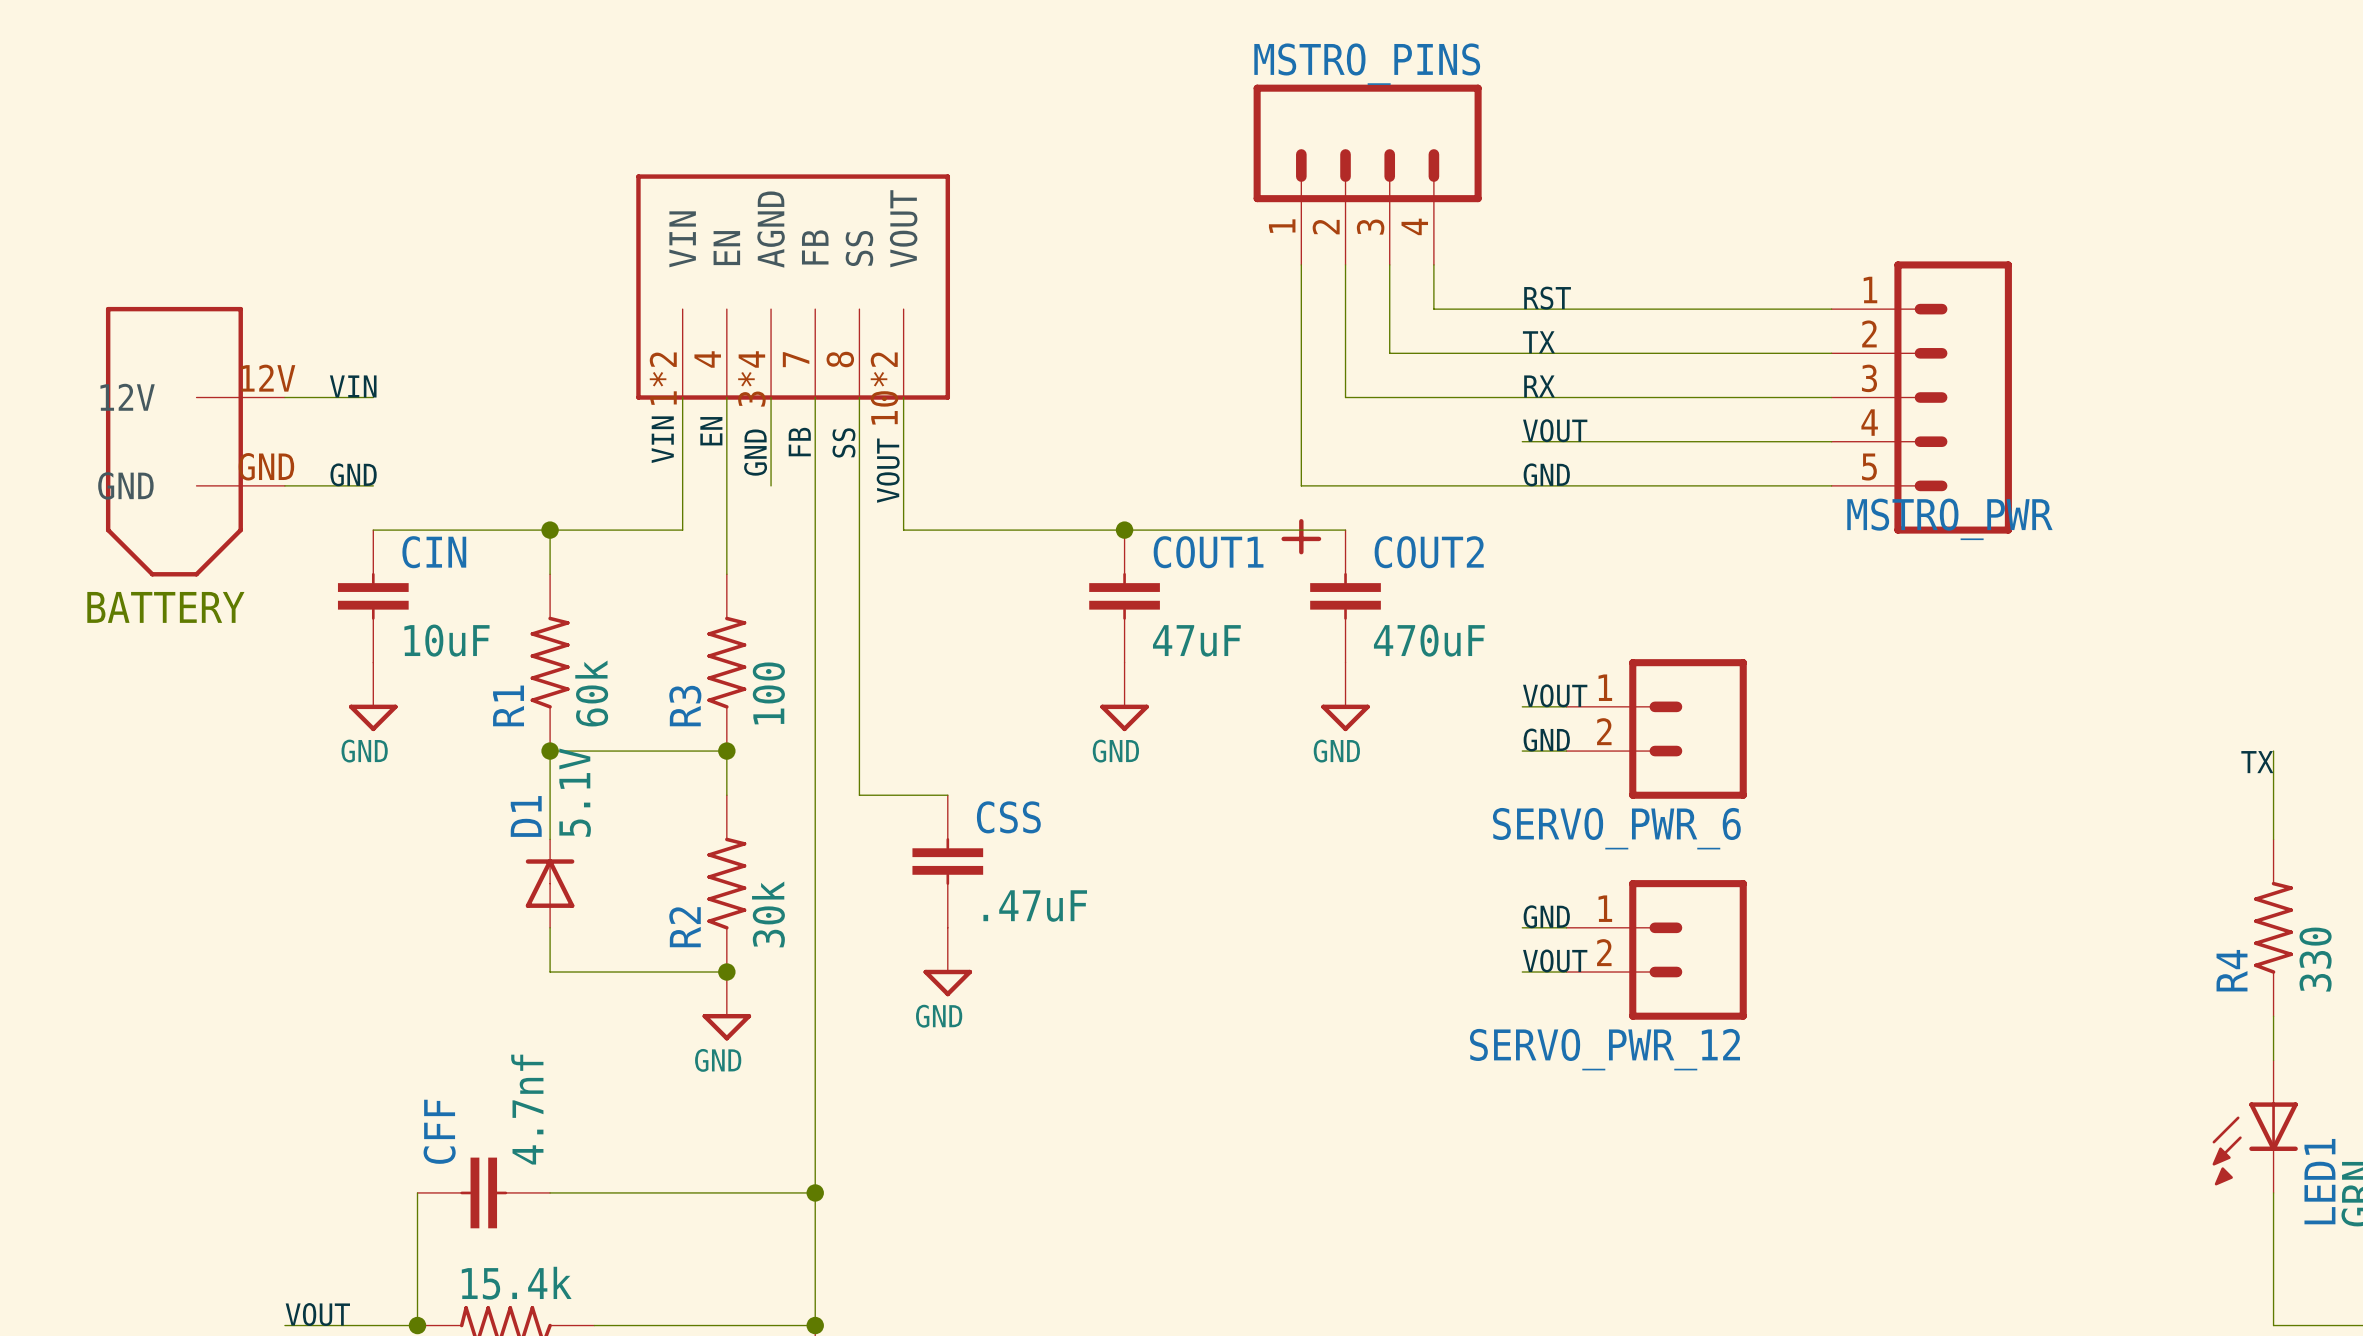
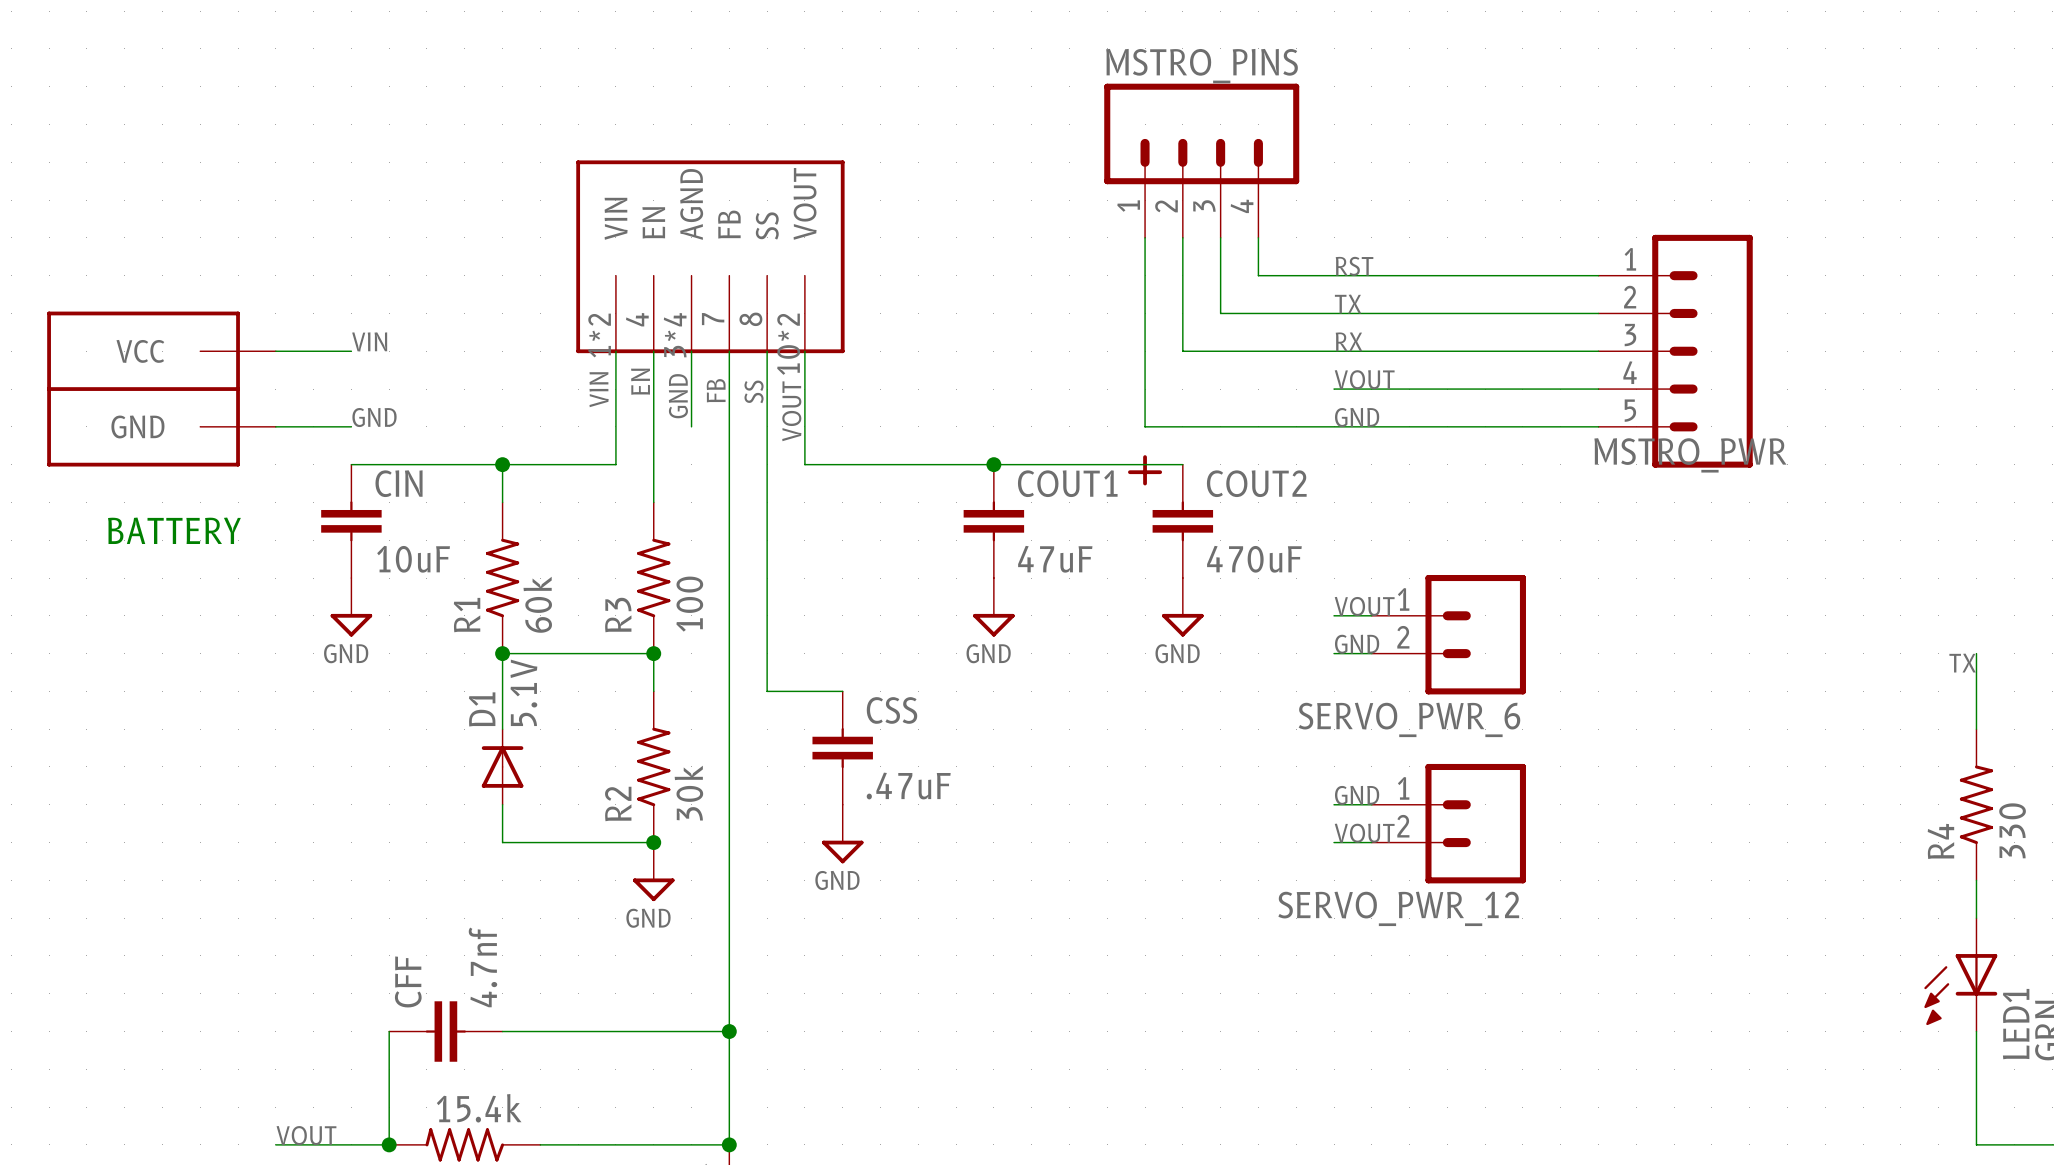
label position: VIN (353, 386) -> VIN (369, 341)
part: none -> (161, 389)
part: (195, 441) -> none
label position: GND (353, 474) -> GND (374, 417)

